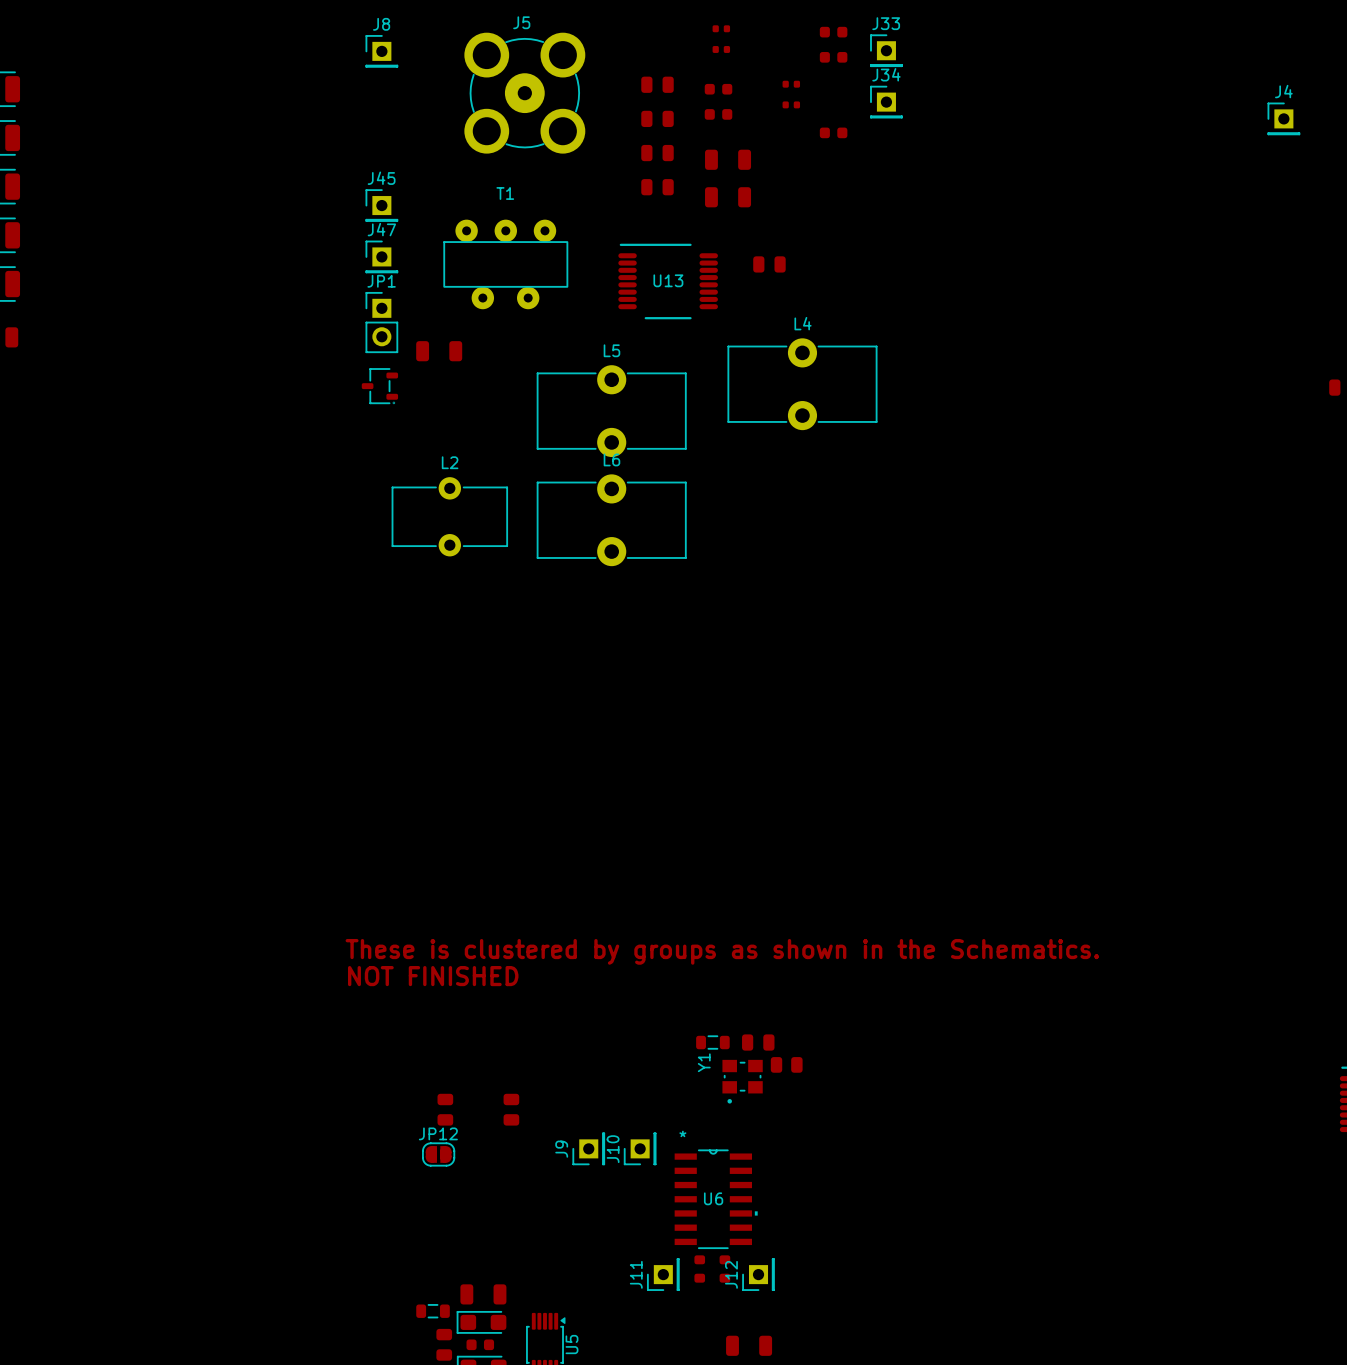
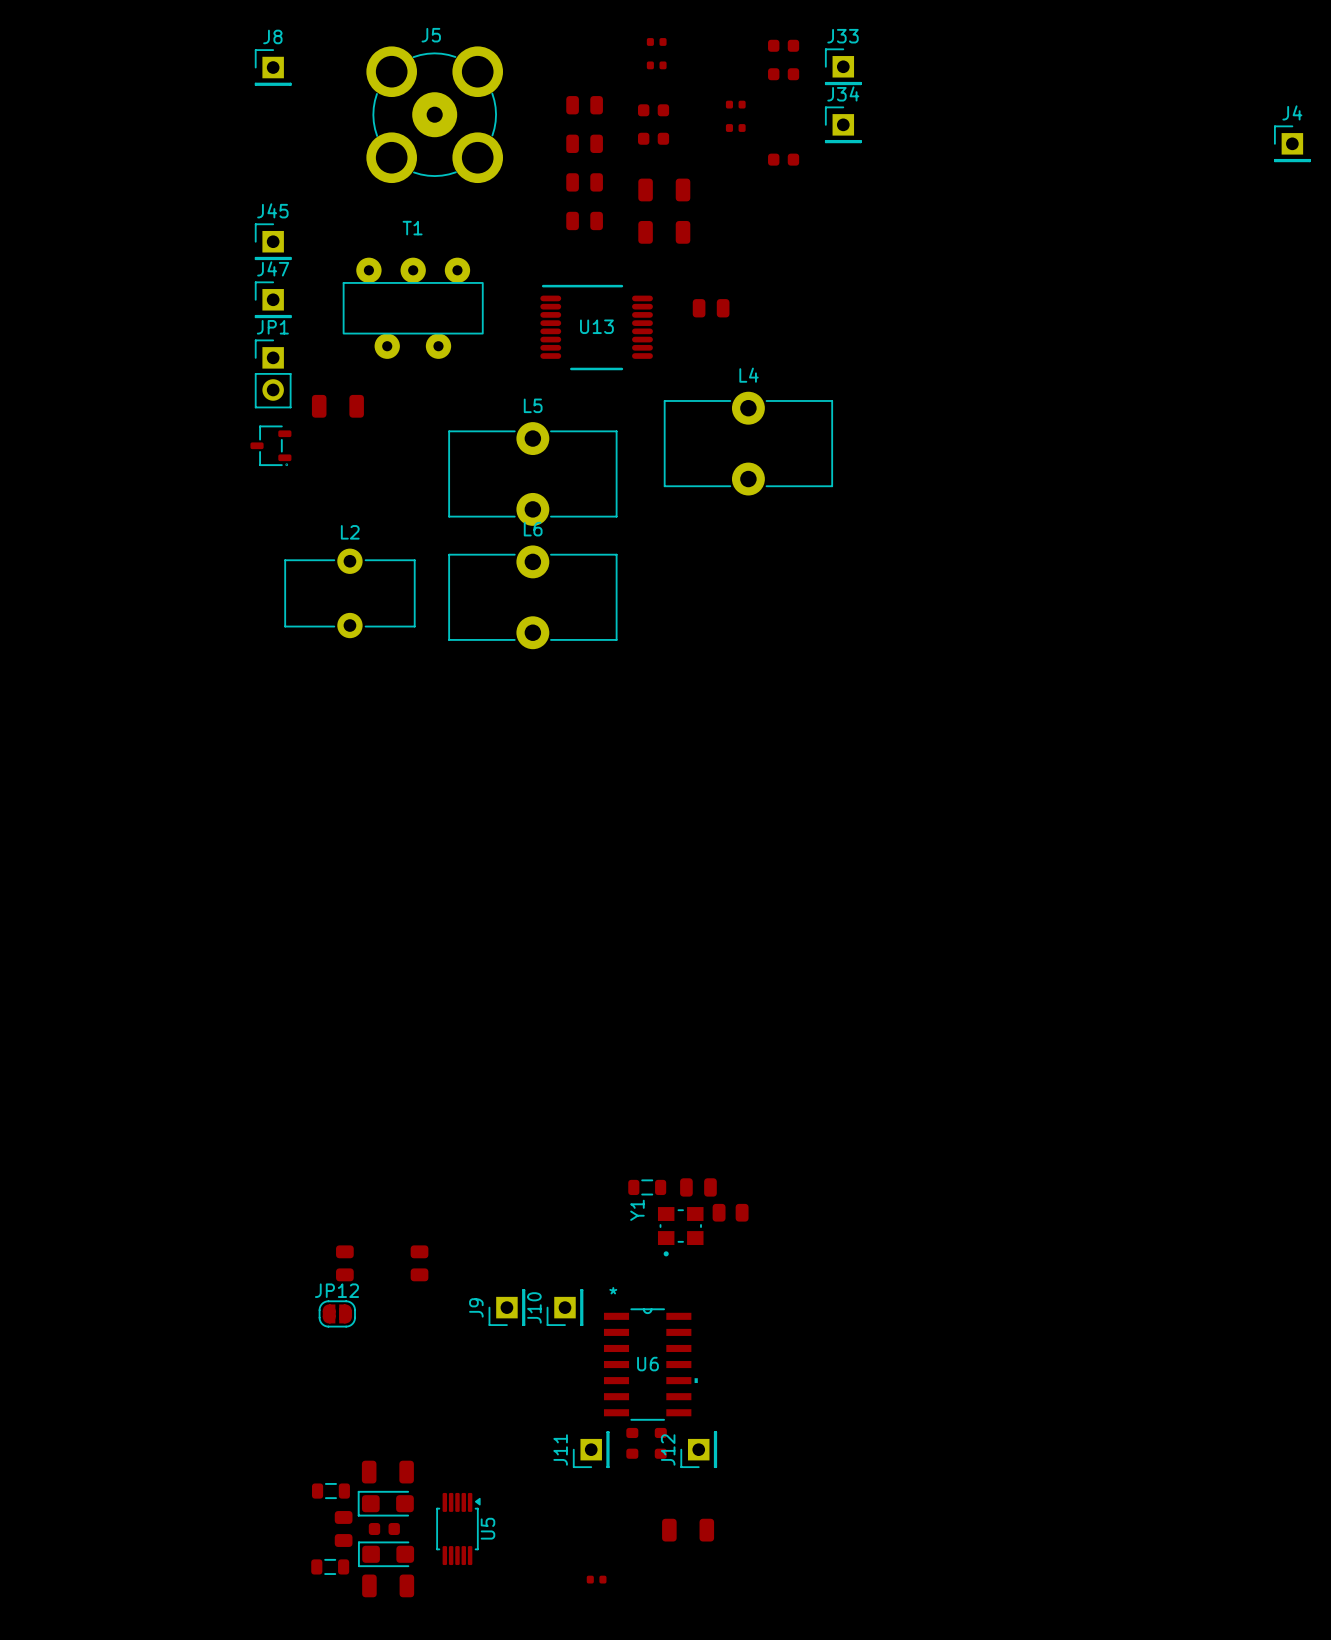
text: These is clustered by groups as shown in the Schematics. (722, 951) -> none
text: NOT FINISHED (433, 976) -> none

